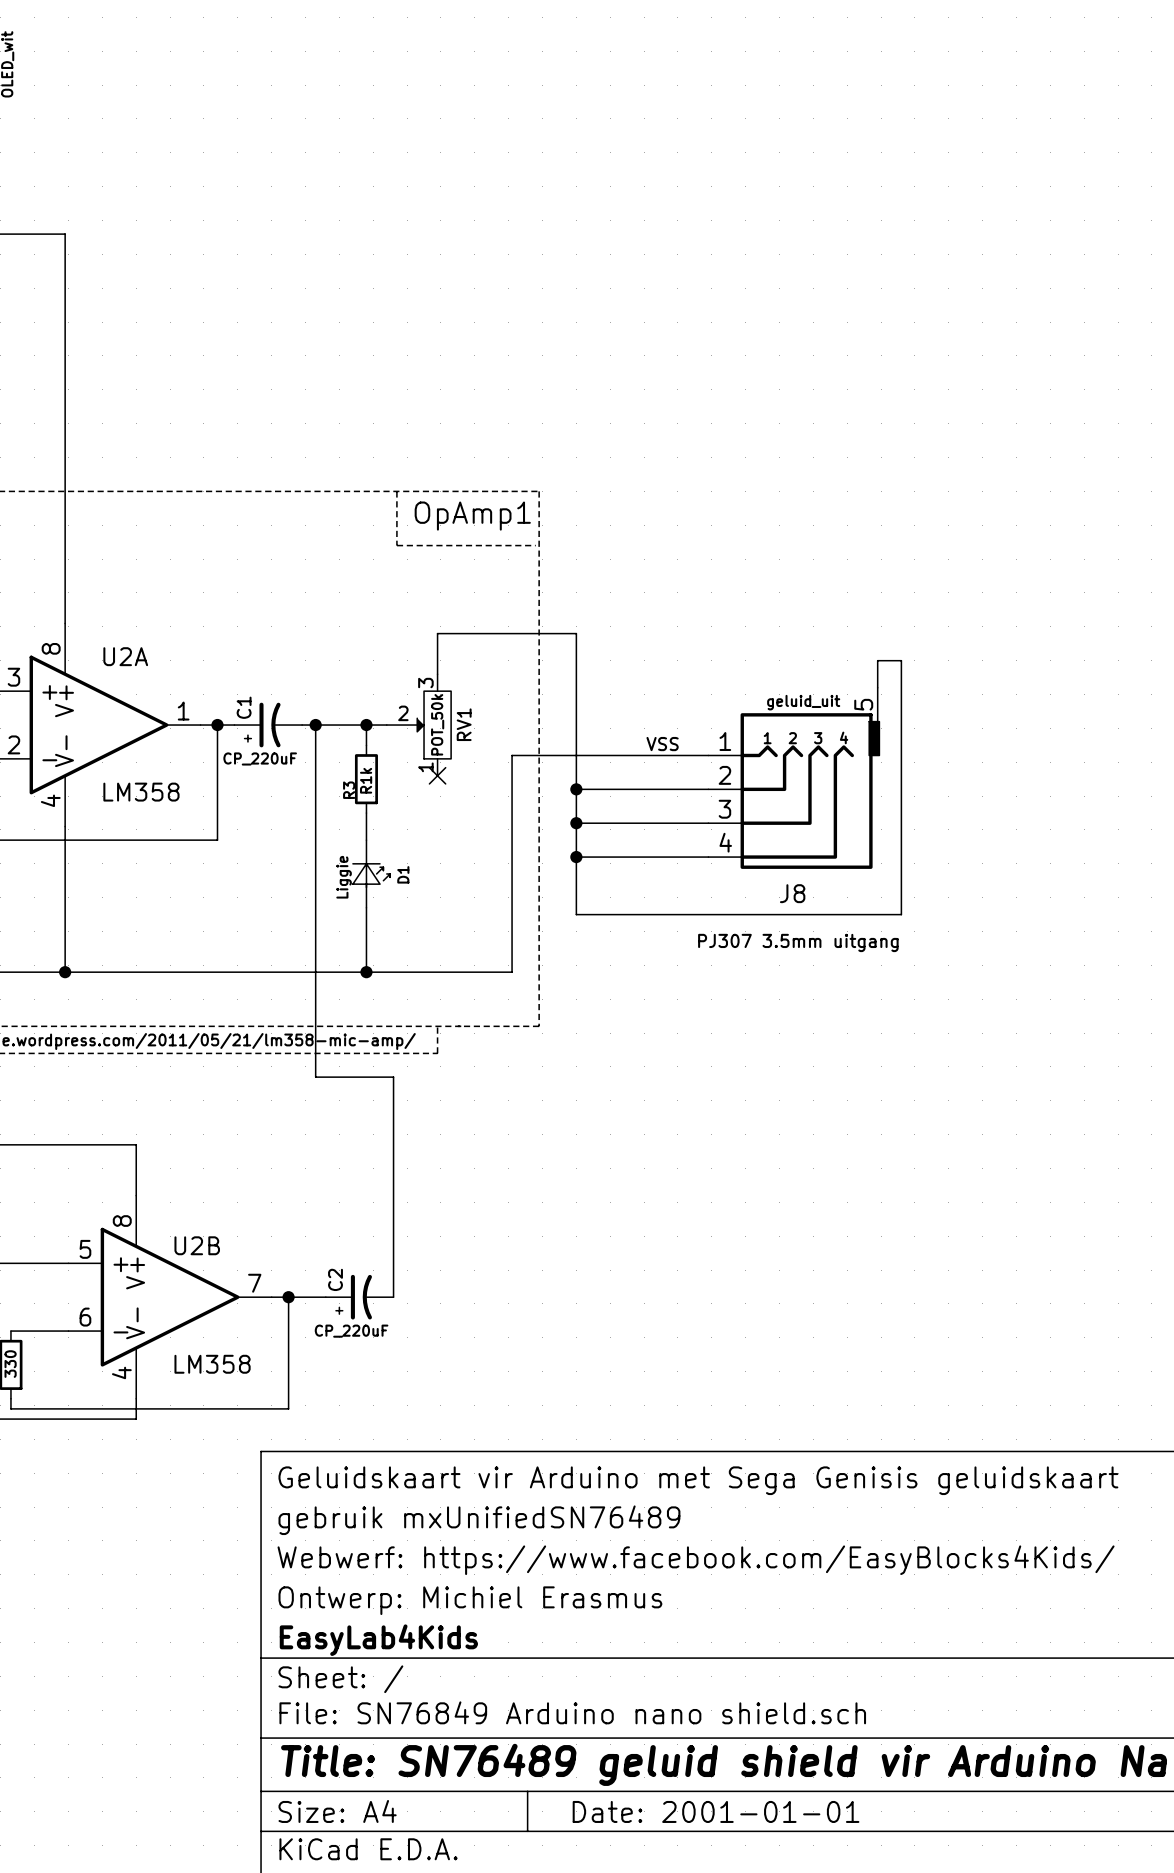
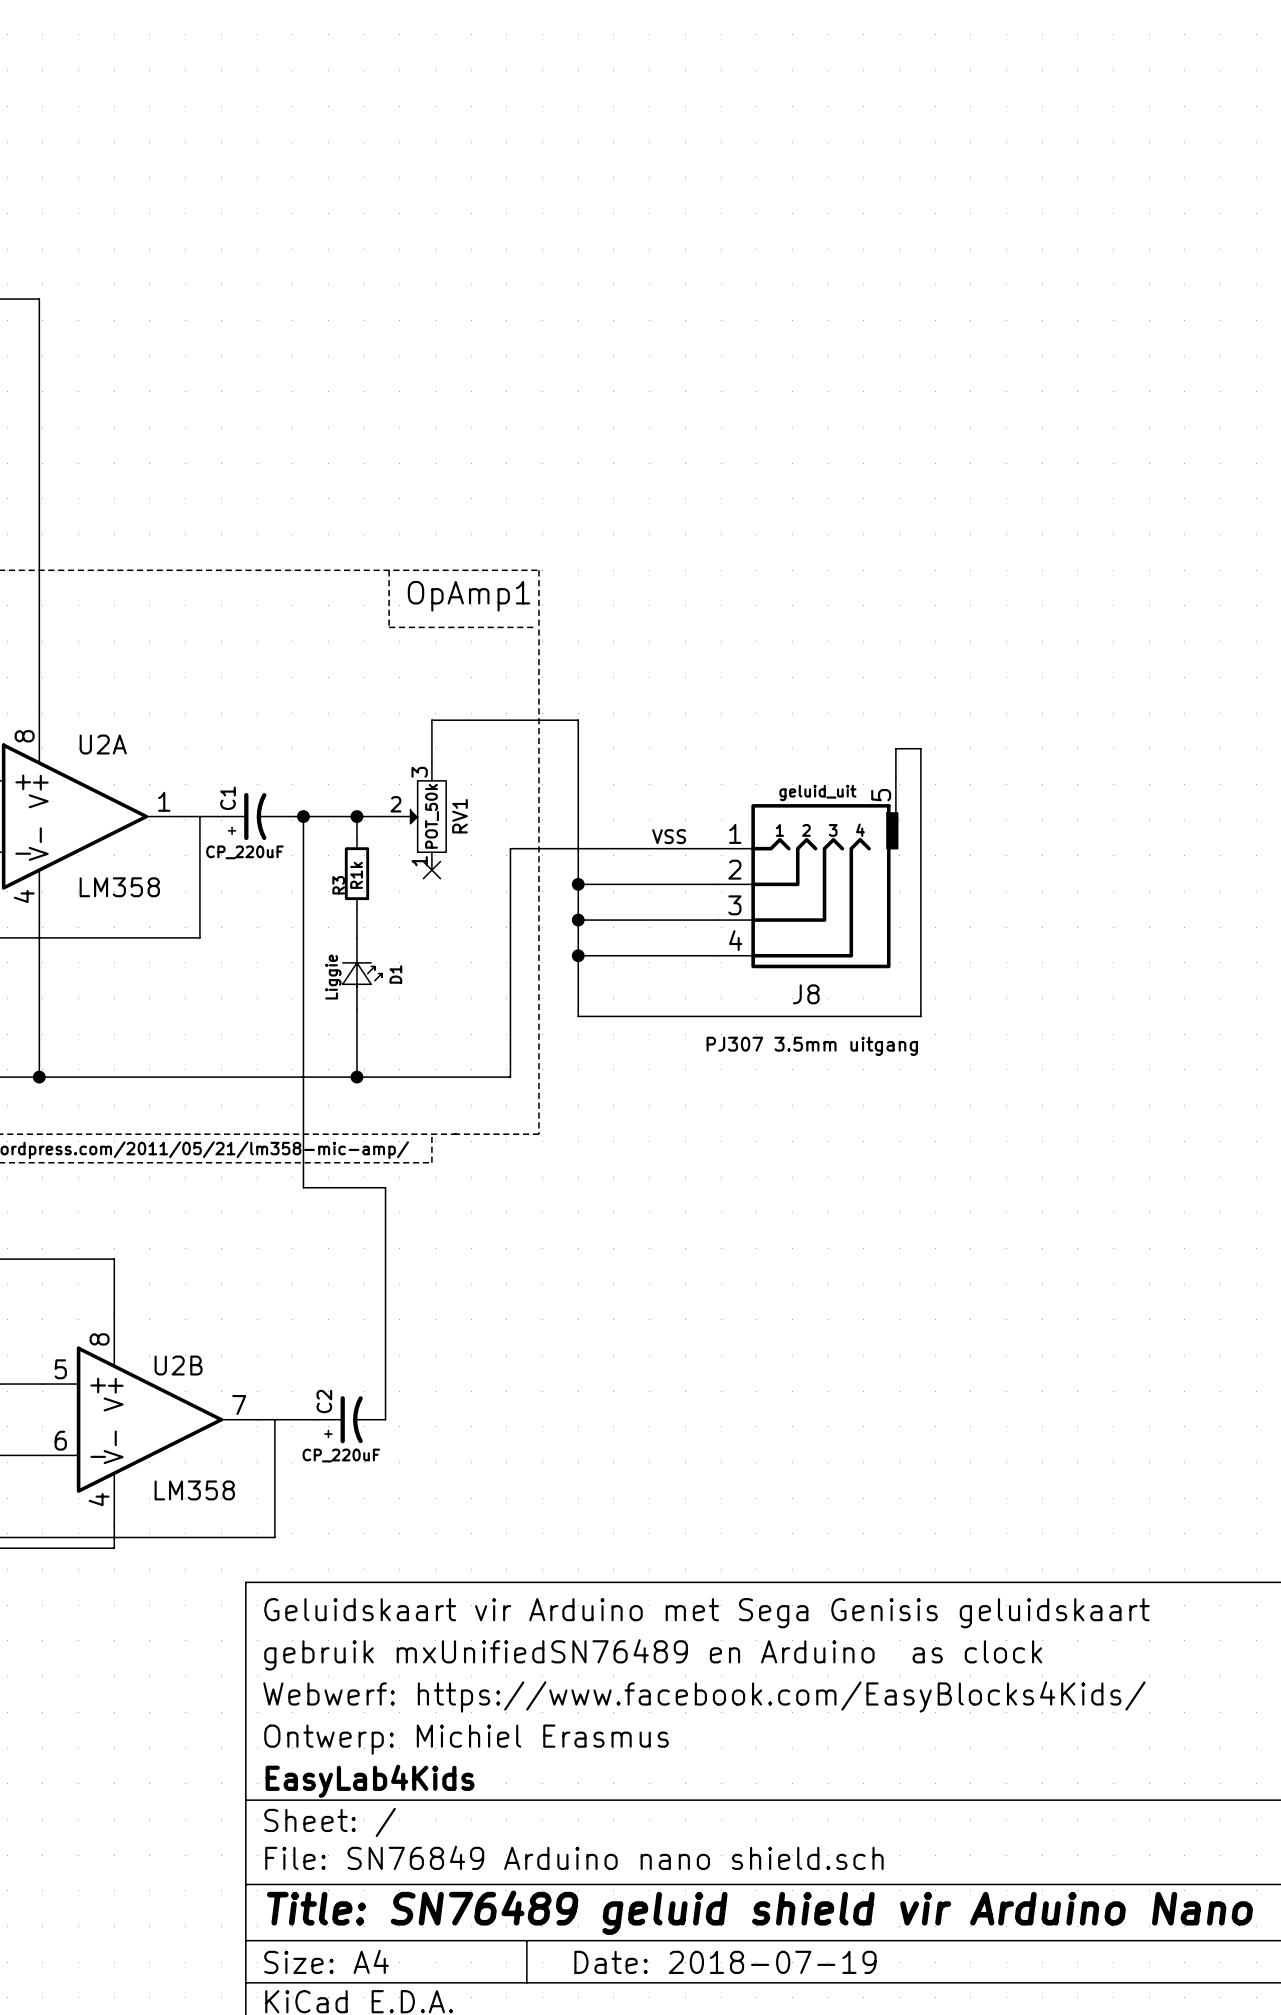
junction: (217, 725) -> none
junction: (288, 1297) -> none
title block: gebruik mxUnifiedSN76489 (479, 1520) -> gebruik mxUnifiedSN76489 en Arduino as clock (653, 1654)
title block: Date: 2001-01-01 (716, 1811) -> Date: 2018-07-19 (725, 1962)

